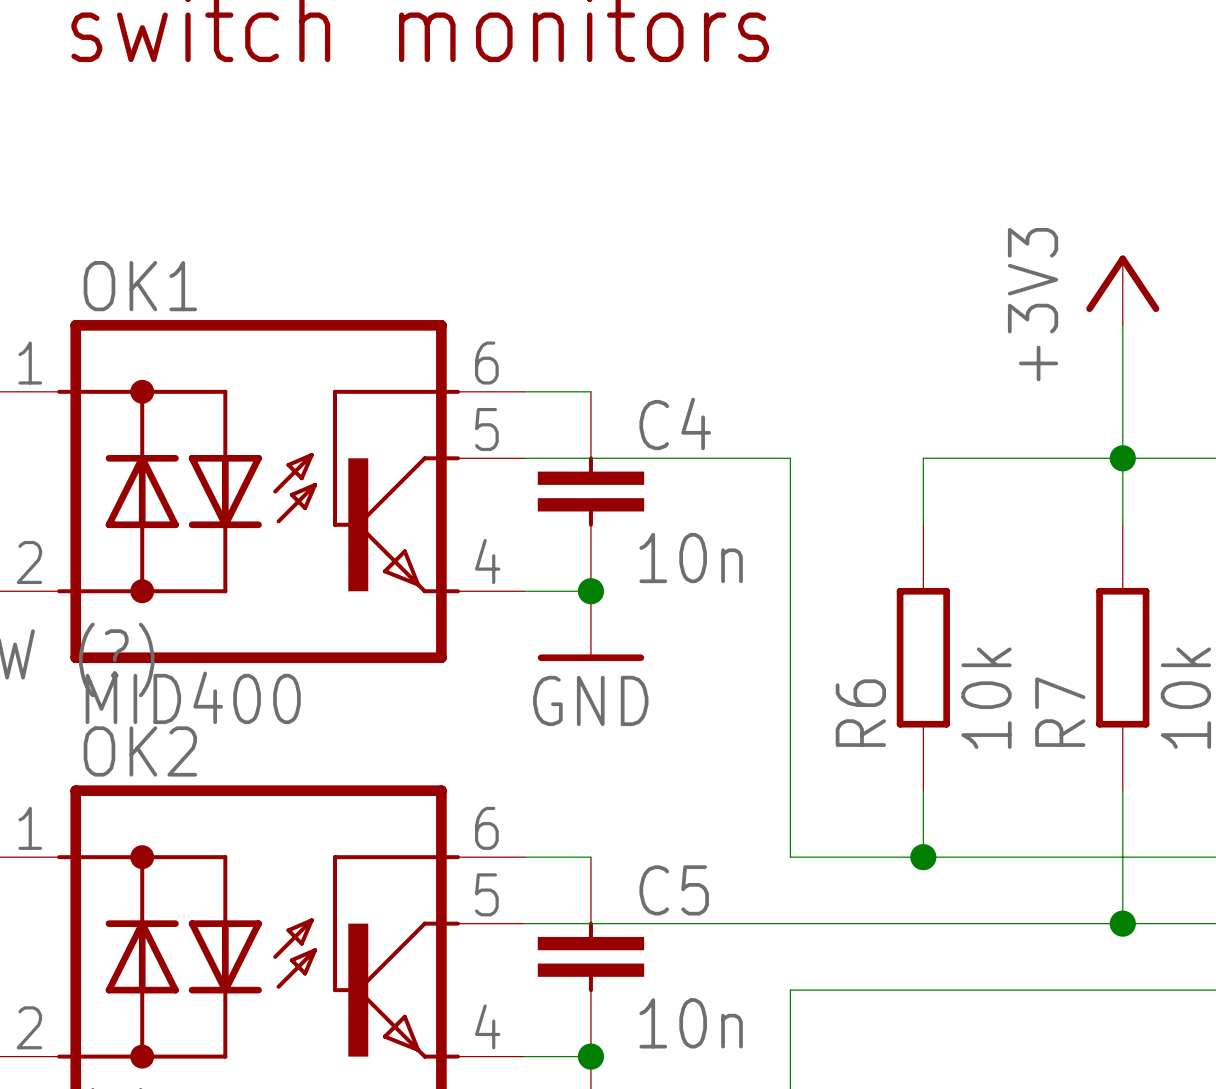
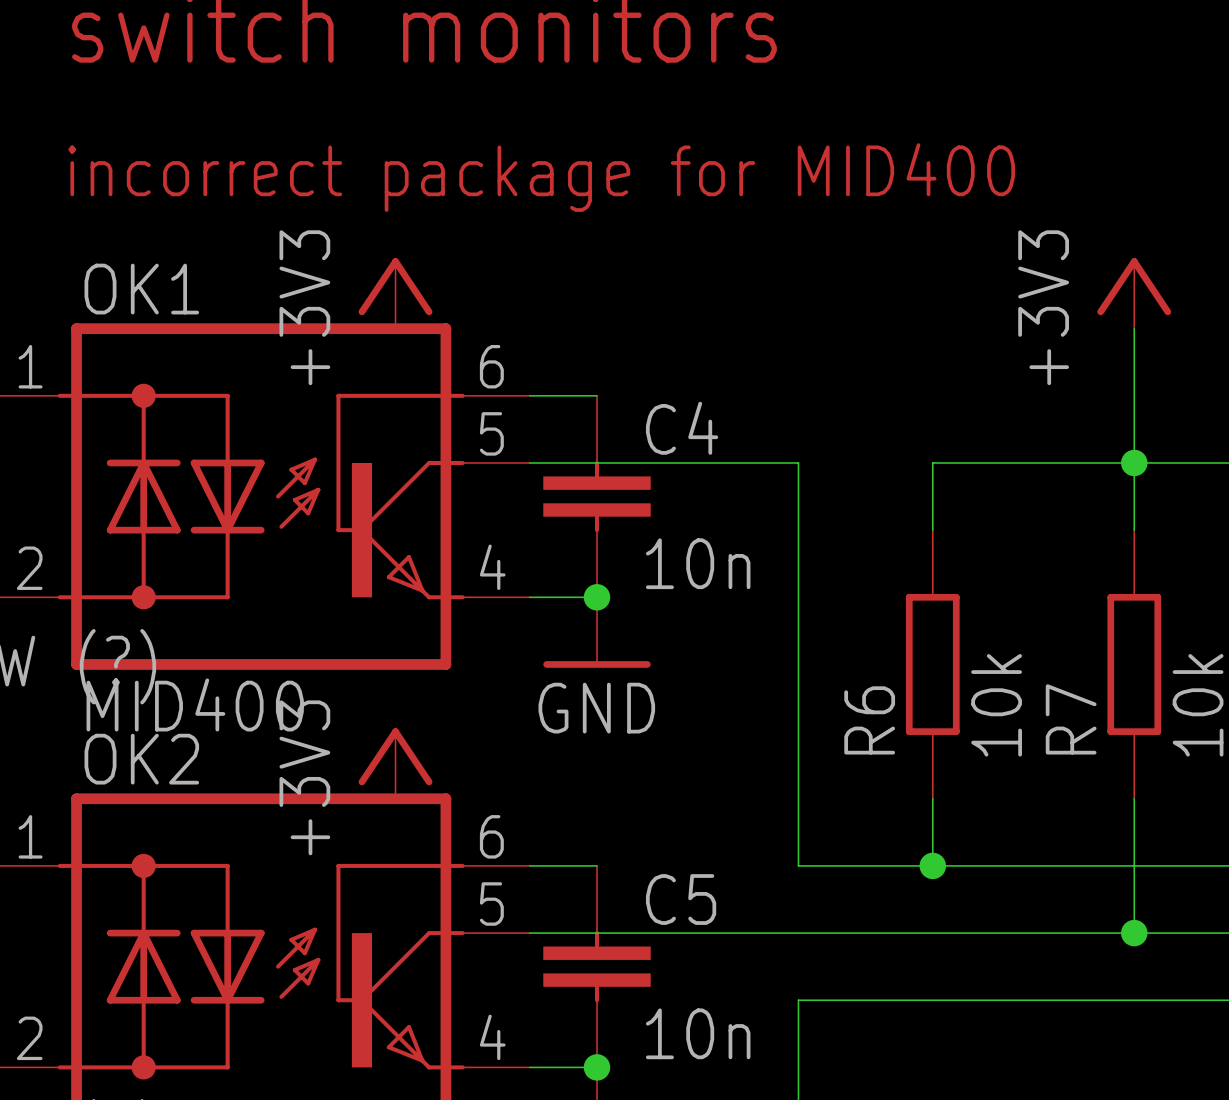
text: none -> incorrect package for MID400 (541, 177)
power symbol: none -> +3V3 (395, 293)
power symbol: none -> +3V3 (395, 763)

